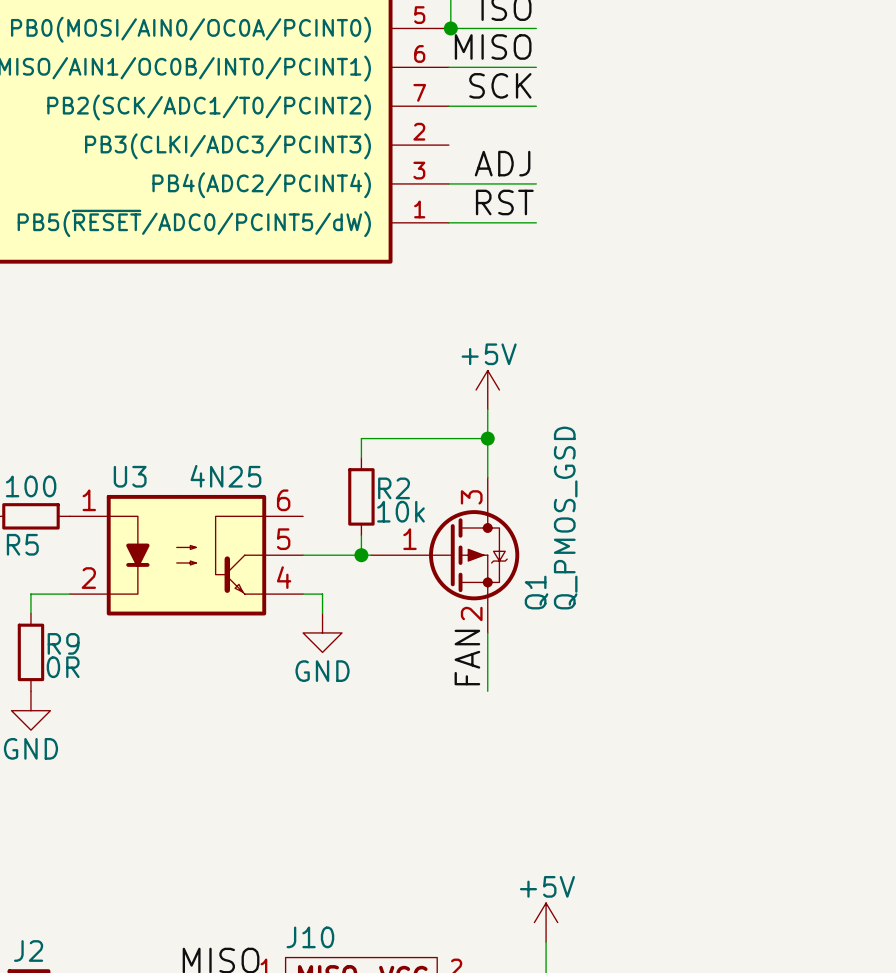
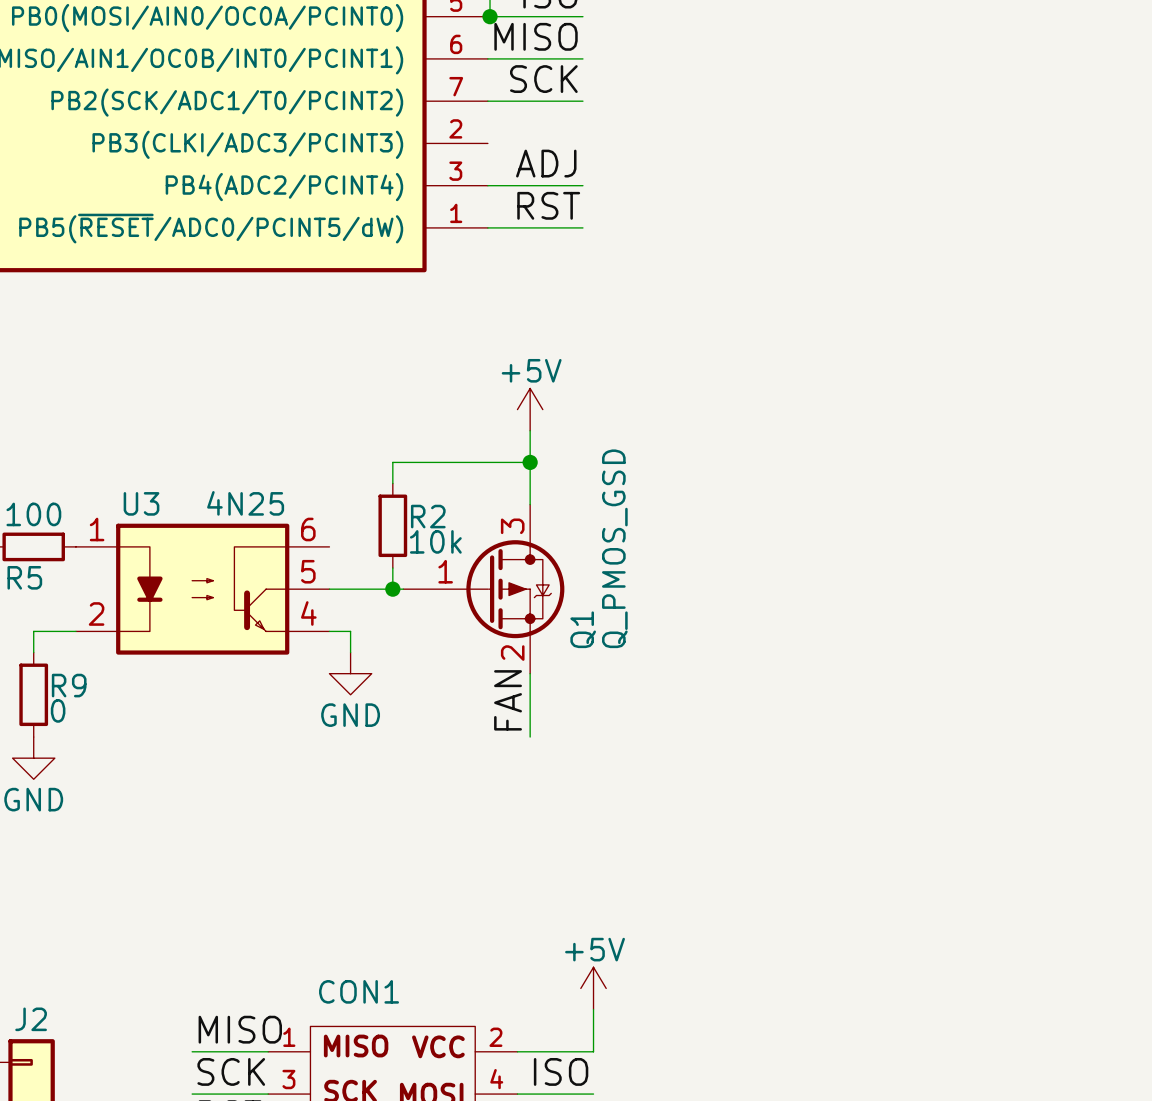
R9 value: 0R (63, 667) -> 0 (58, 710)
J10 name: J10 (310, 937) -> CON1 (359, 991)

